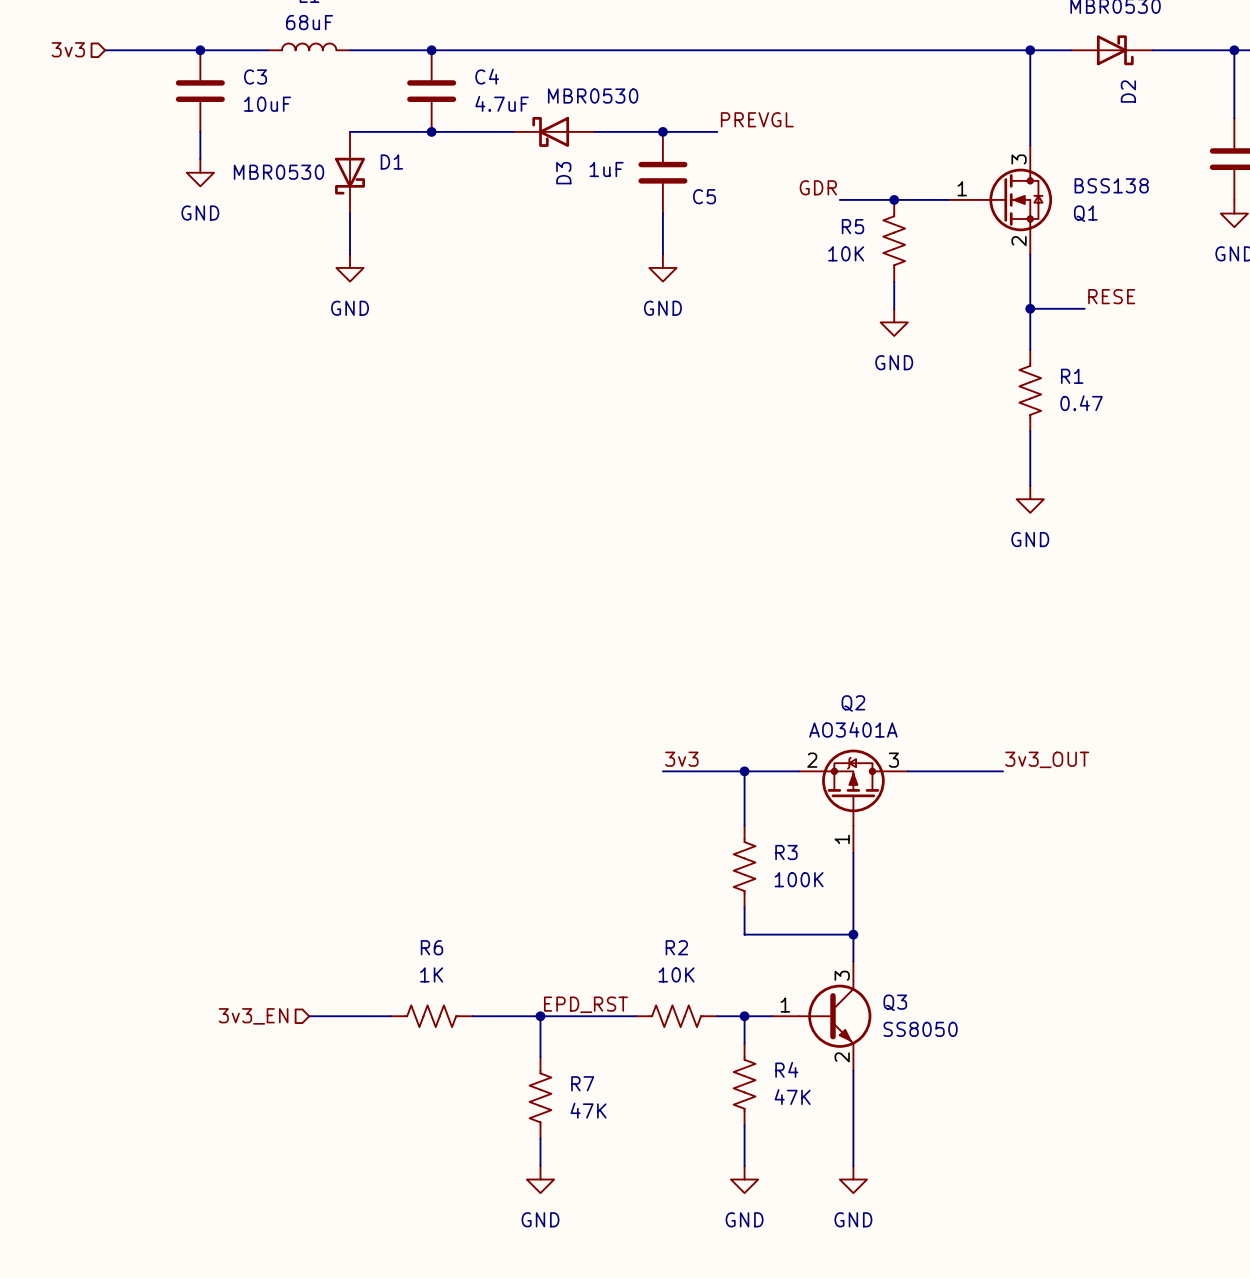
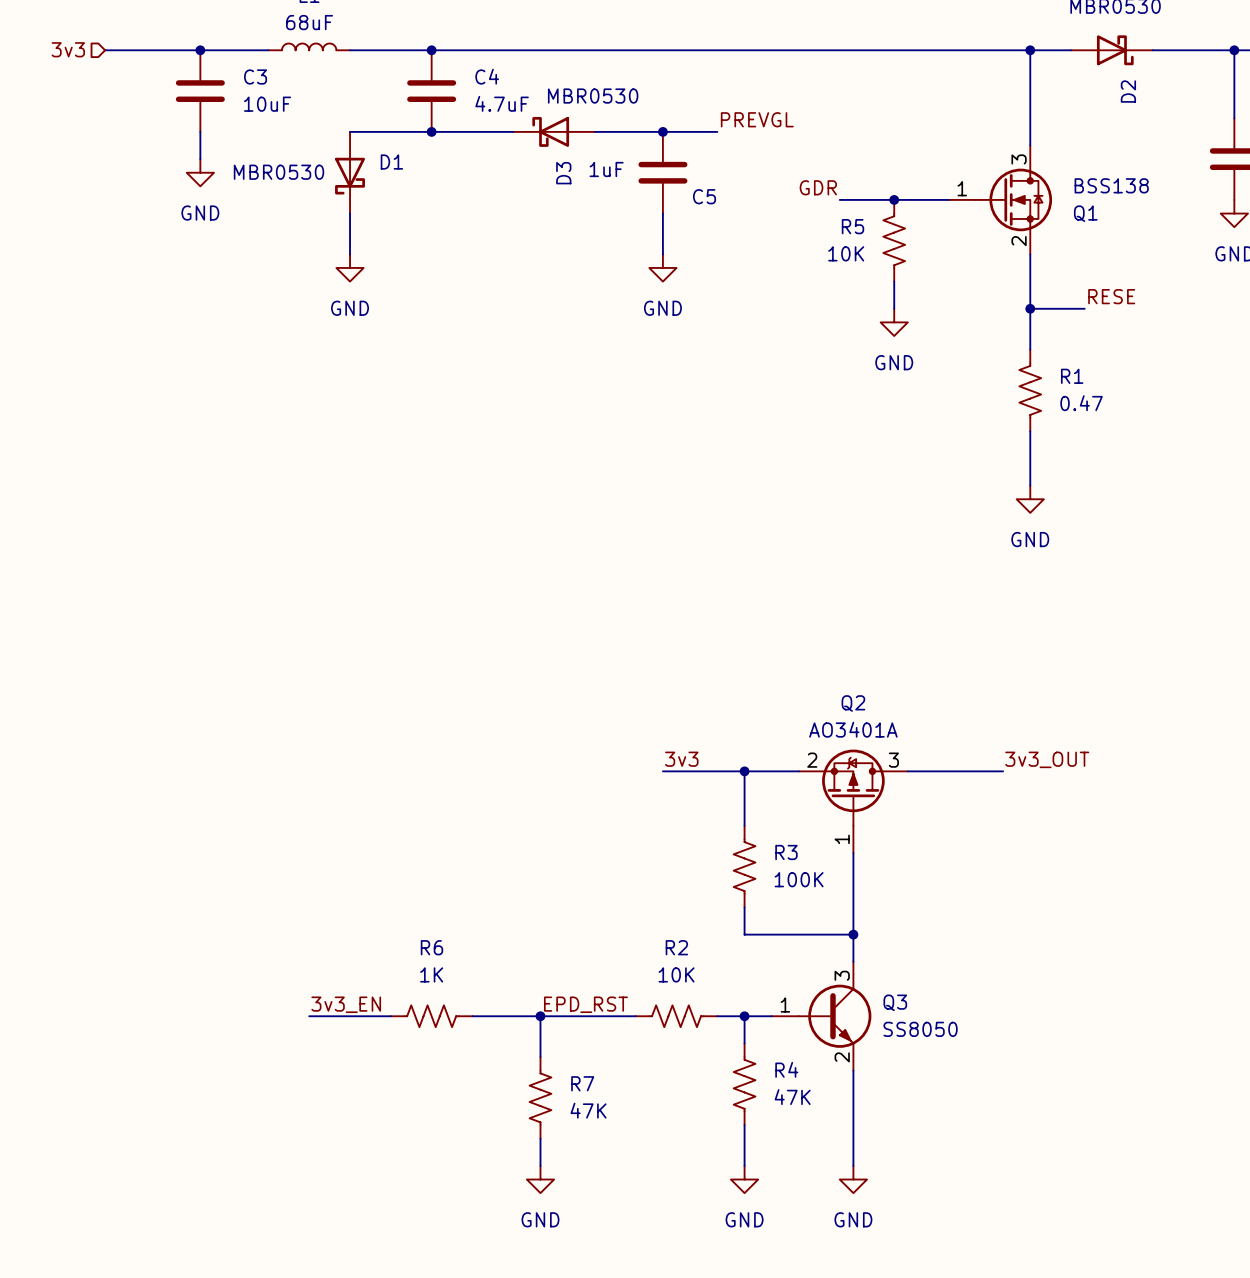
label: none -> 3v3_EN (346, 1004)
hierarchical label: 3v3_EN (253, 1016) -> none

